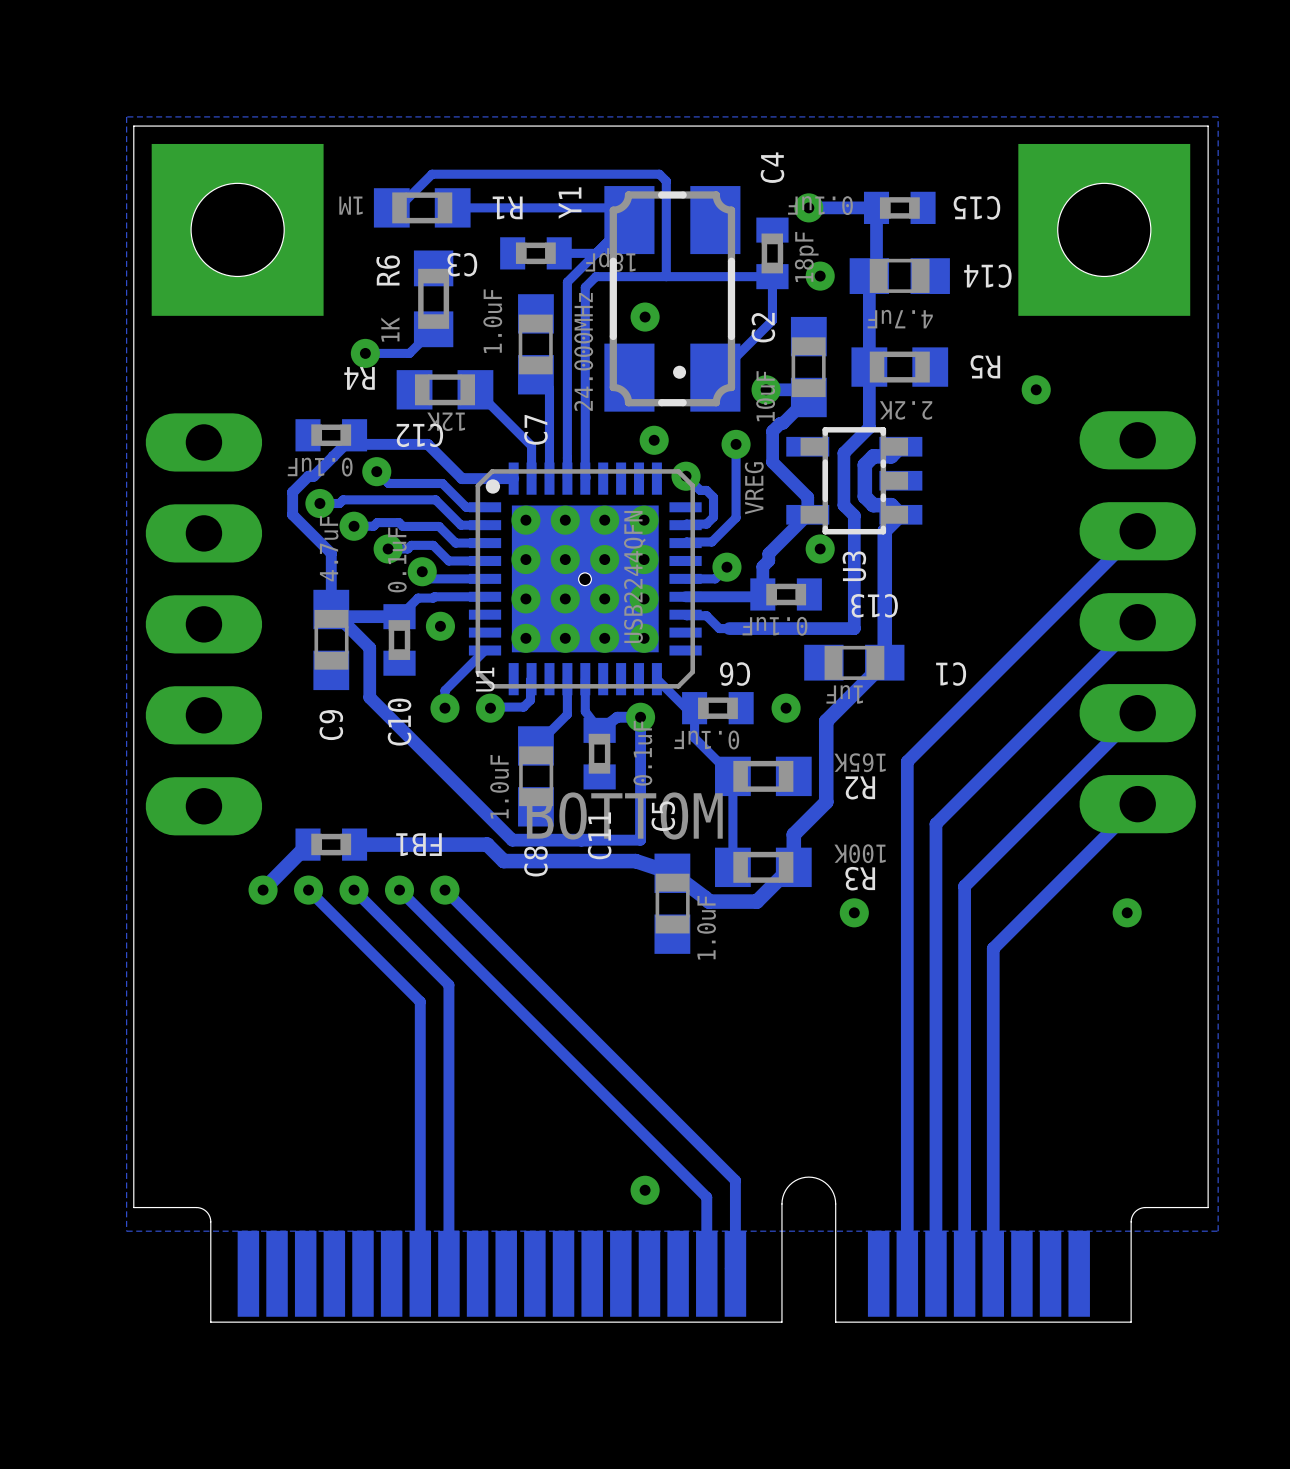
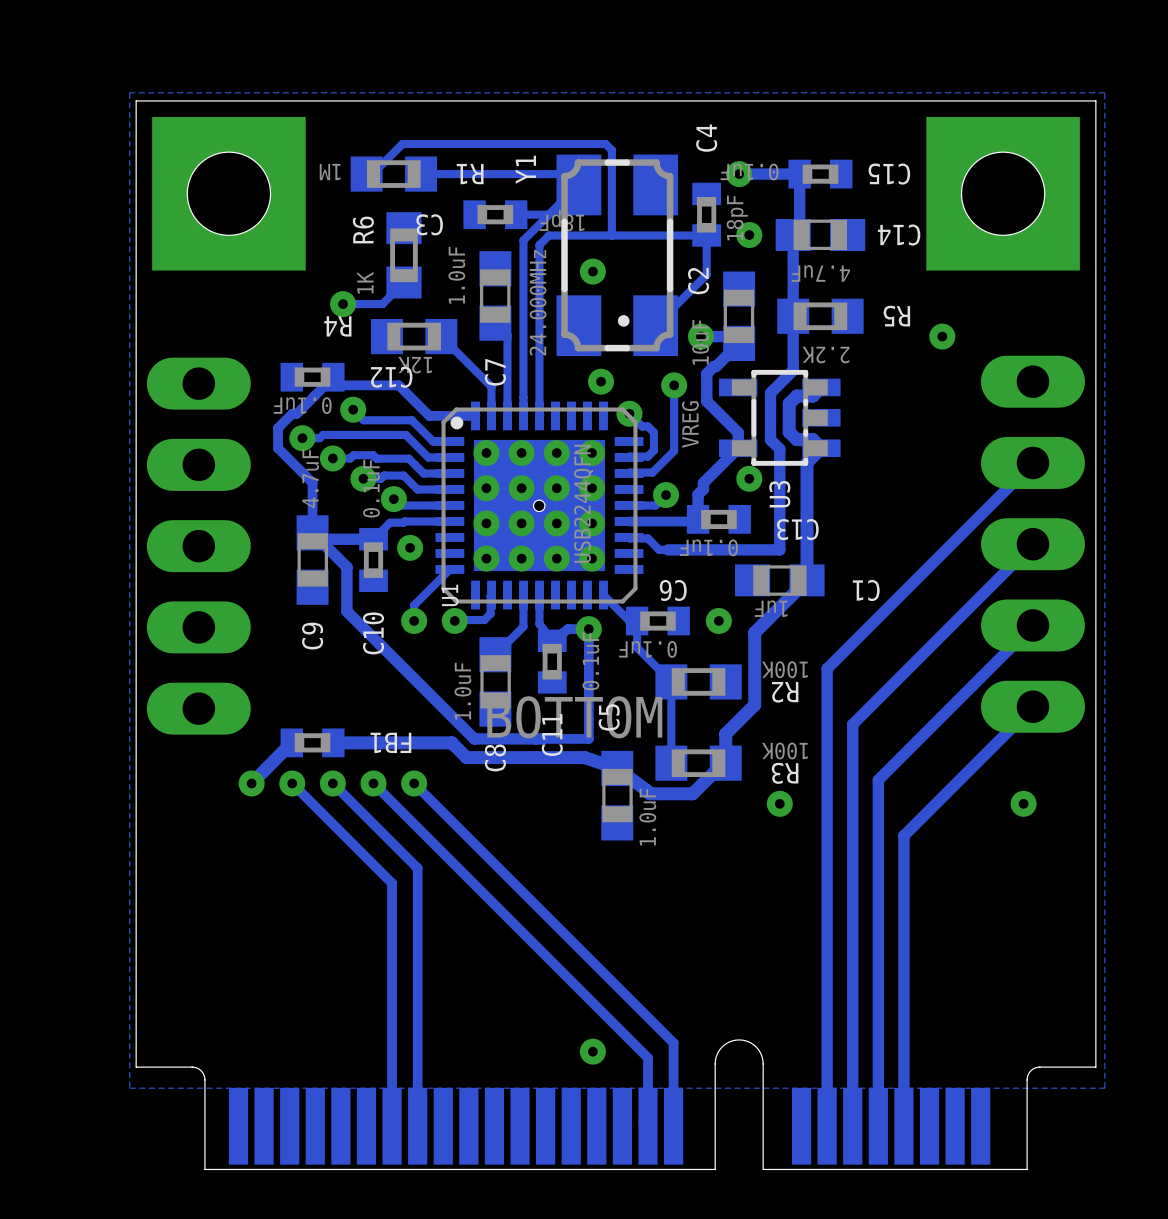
R2 value: 165K (860, 762) -> 100K (784, 669)

